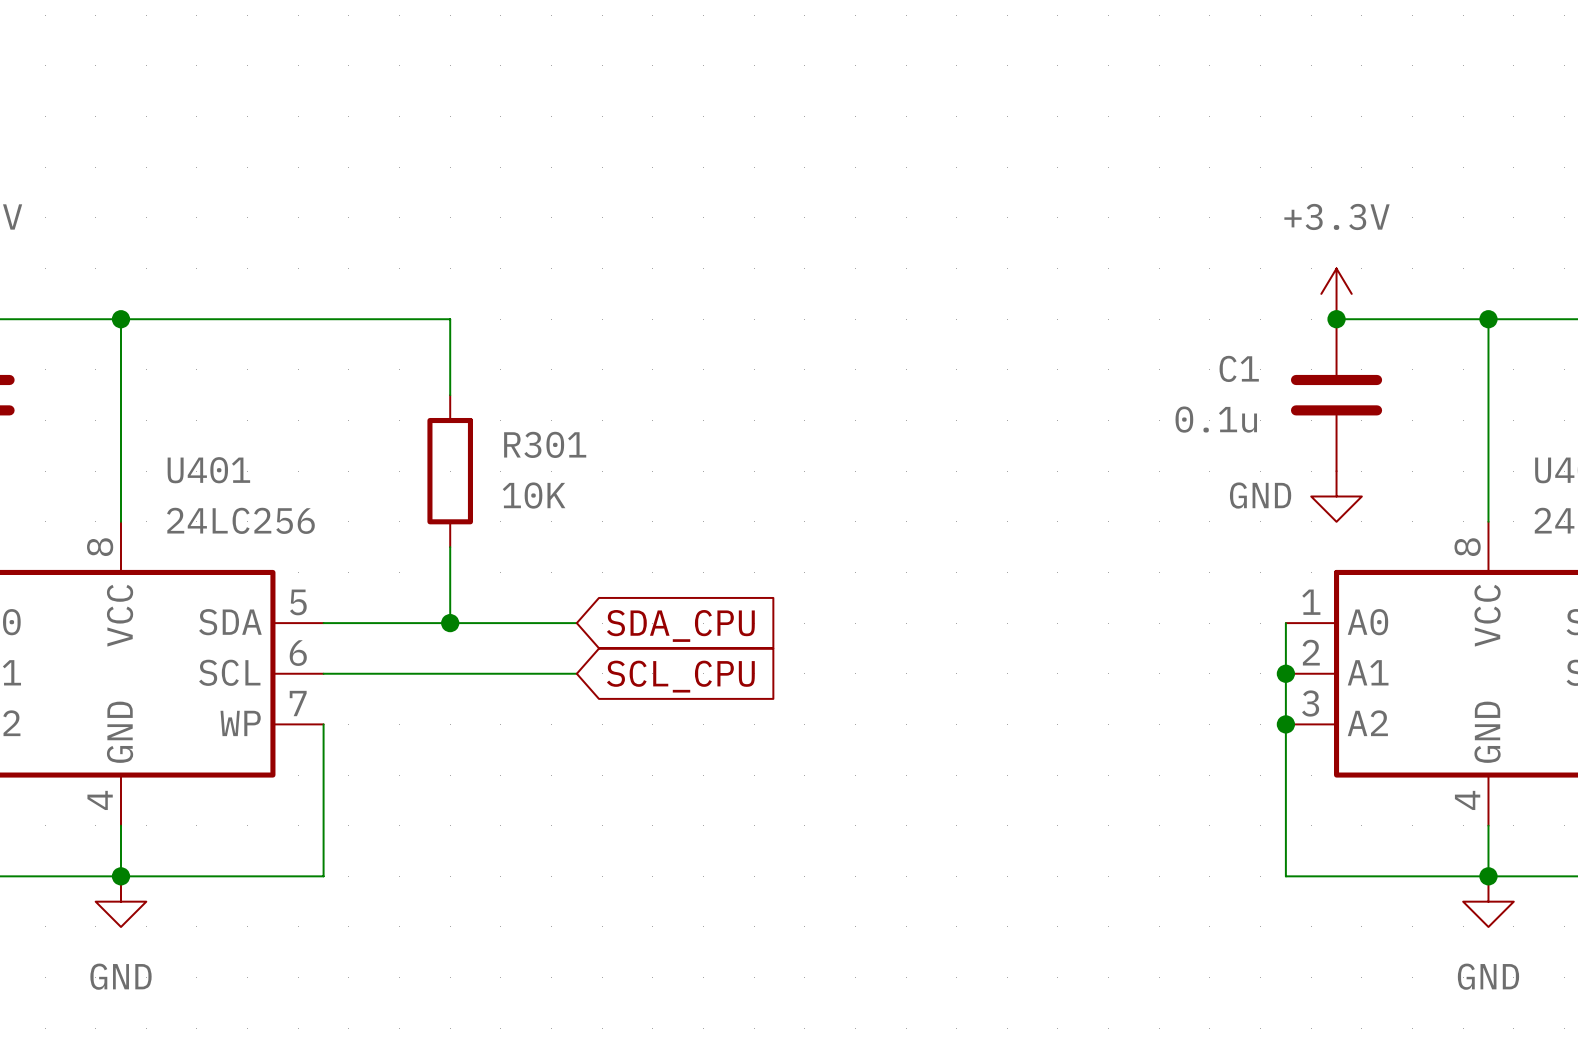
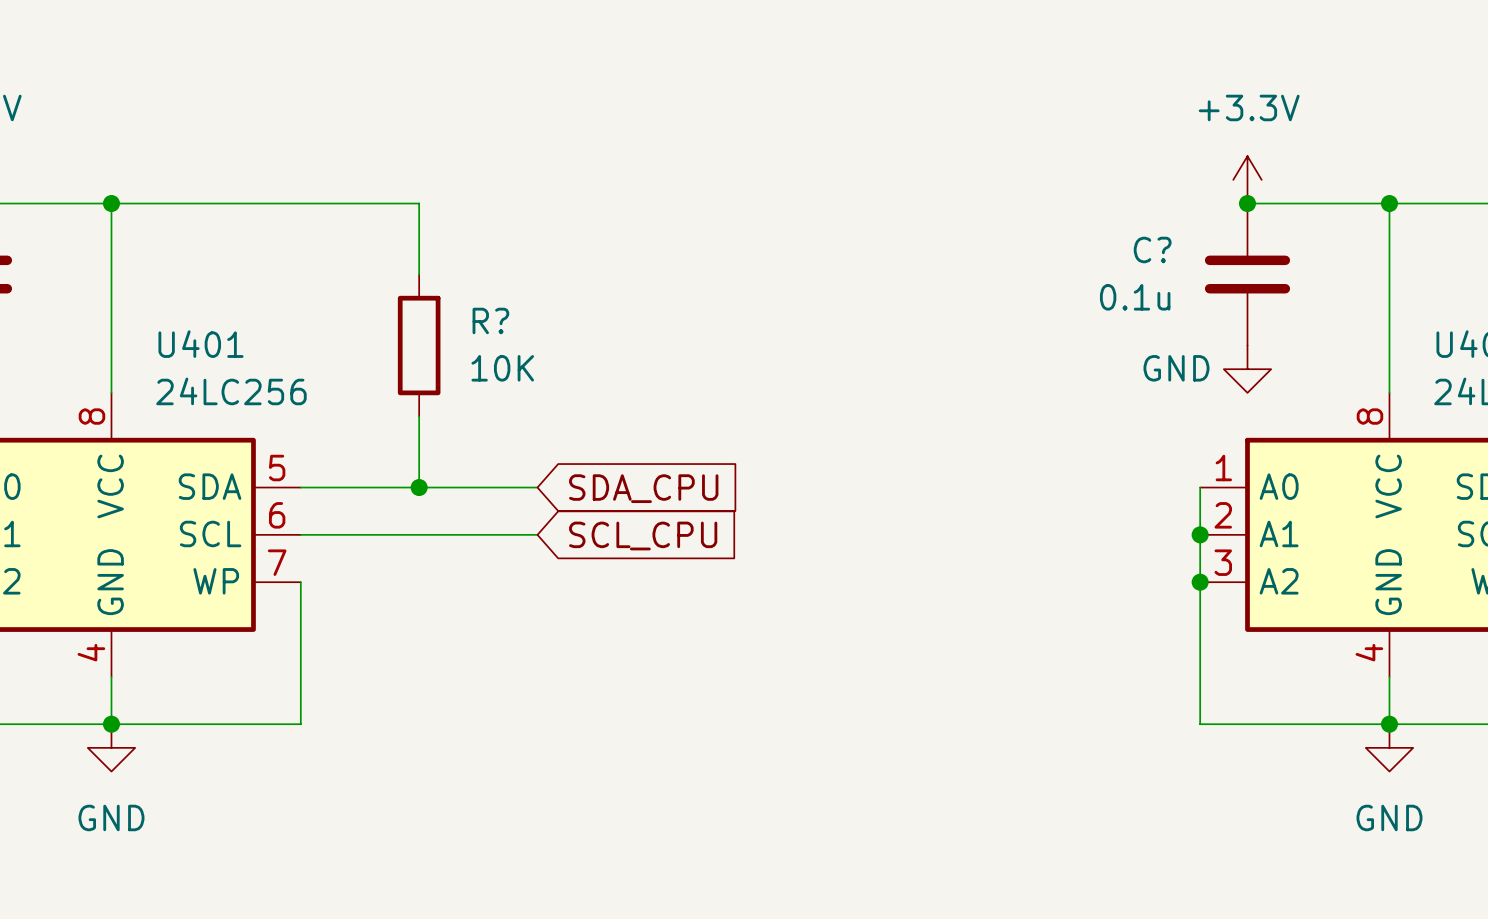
C1 name: C1 (1239, 368) -> C? (1152, 249)
R301 name: R301 (545, 444) -> R? (490, 320)

